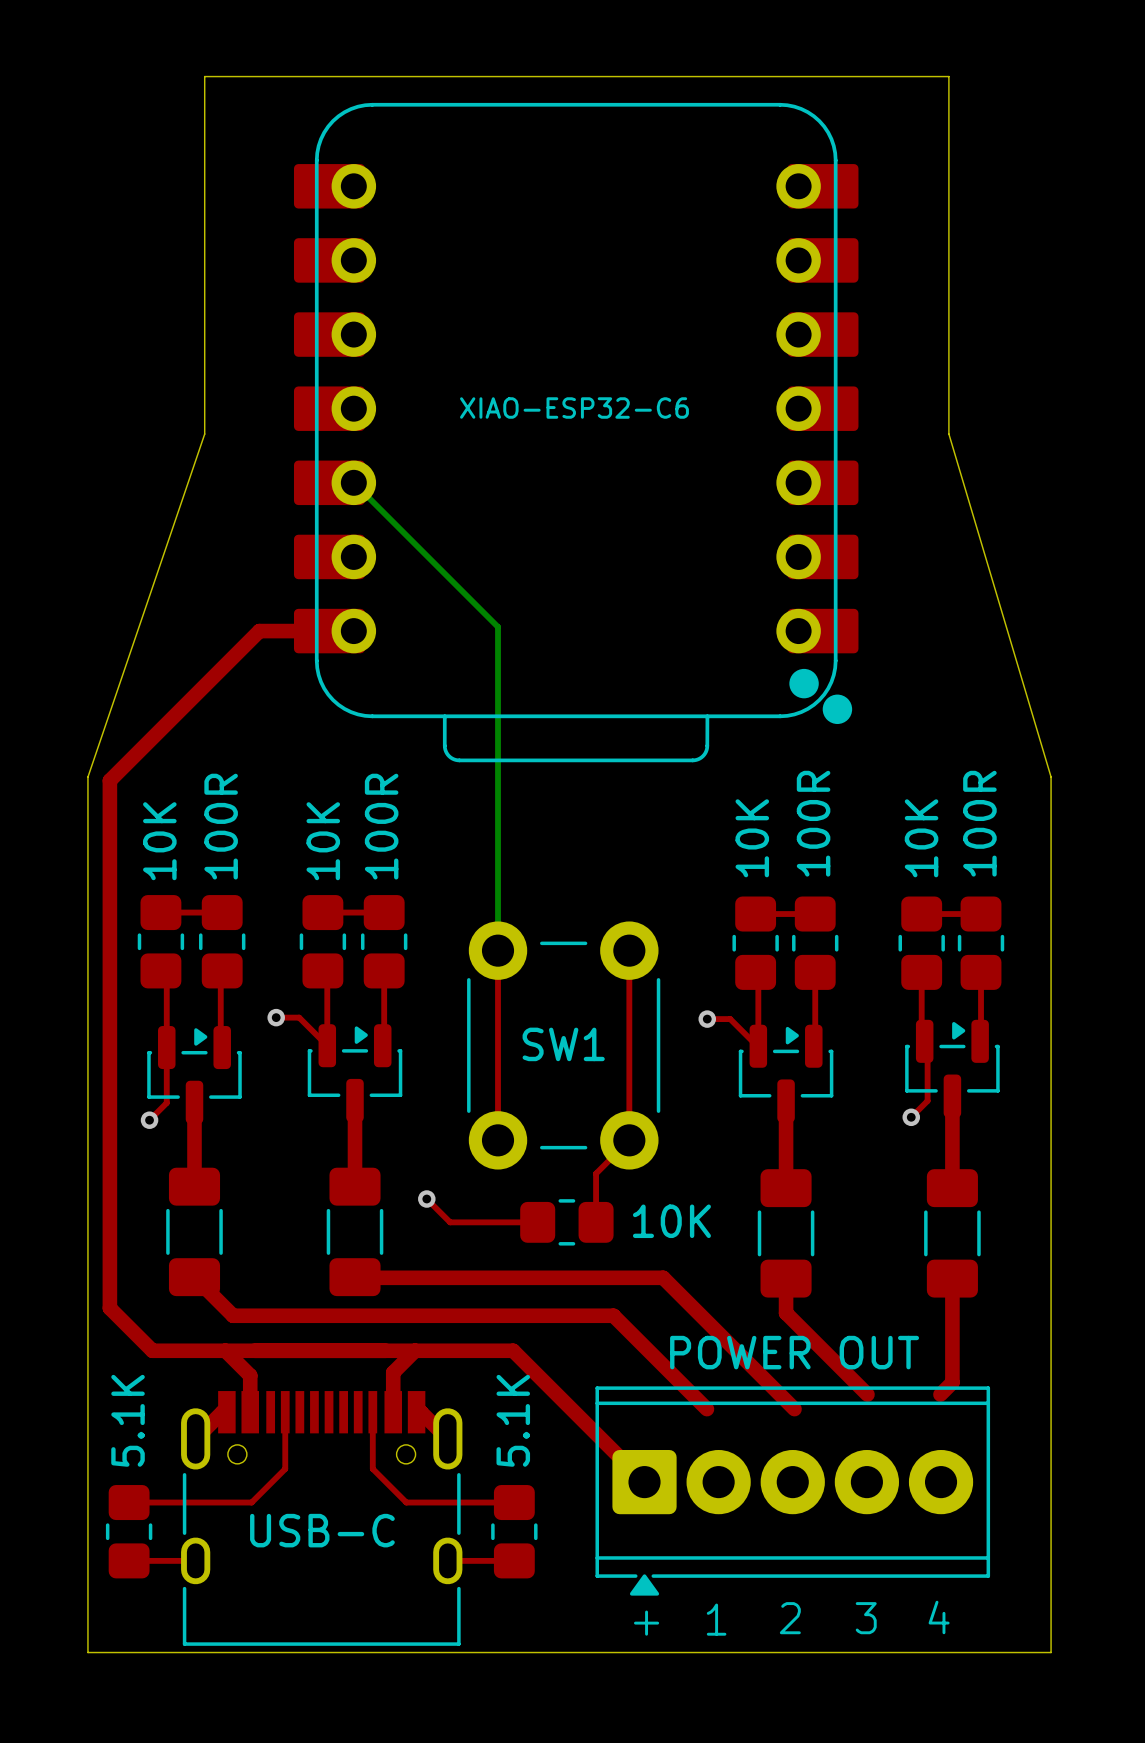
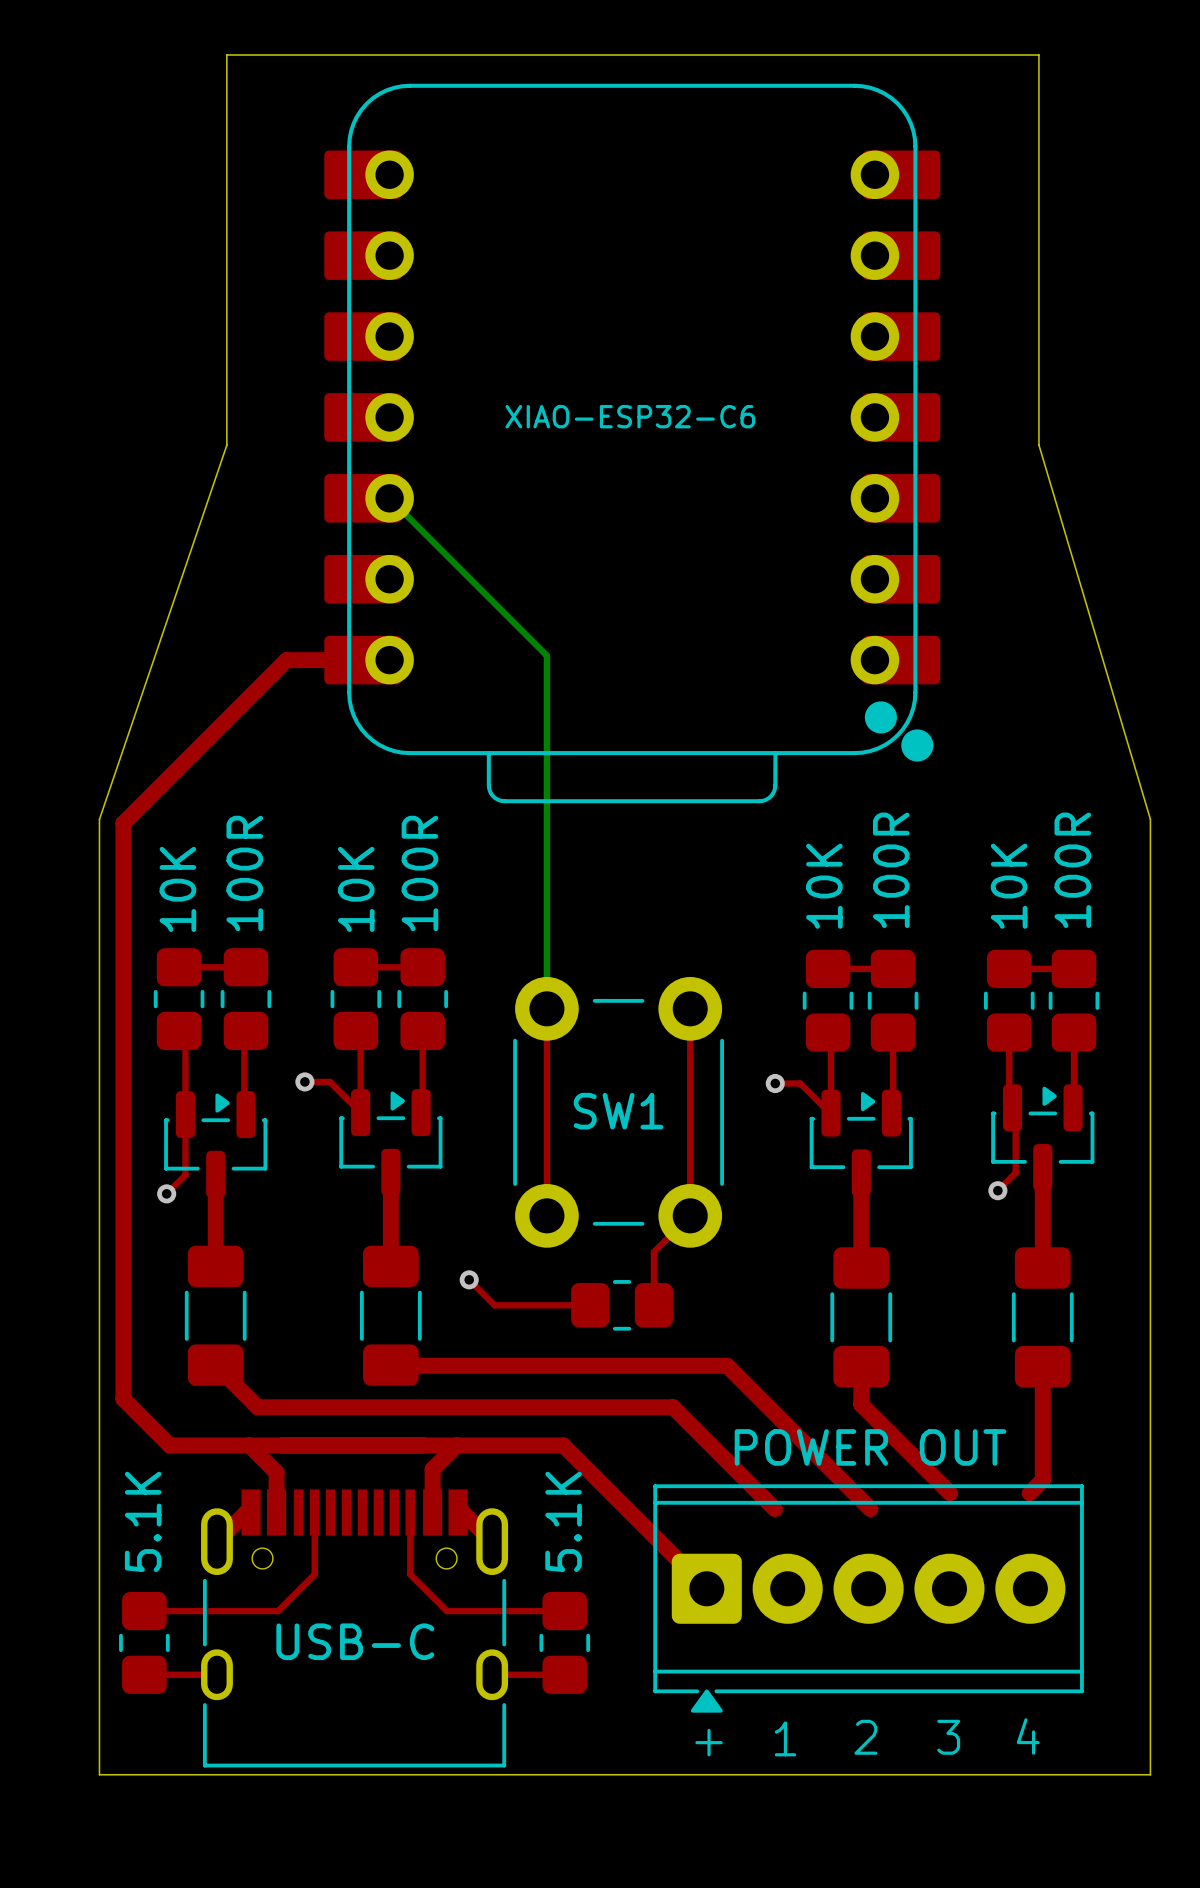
part value: 10K (671, 1221) -> none

